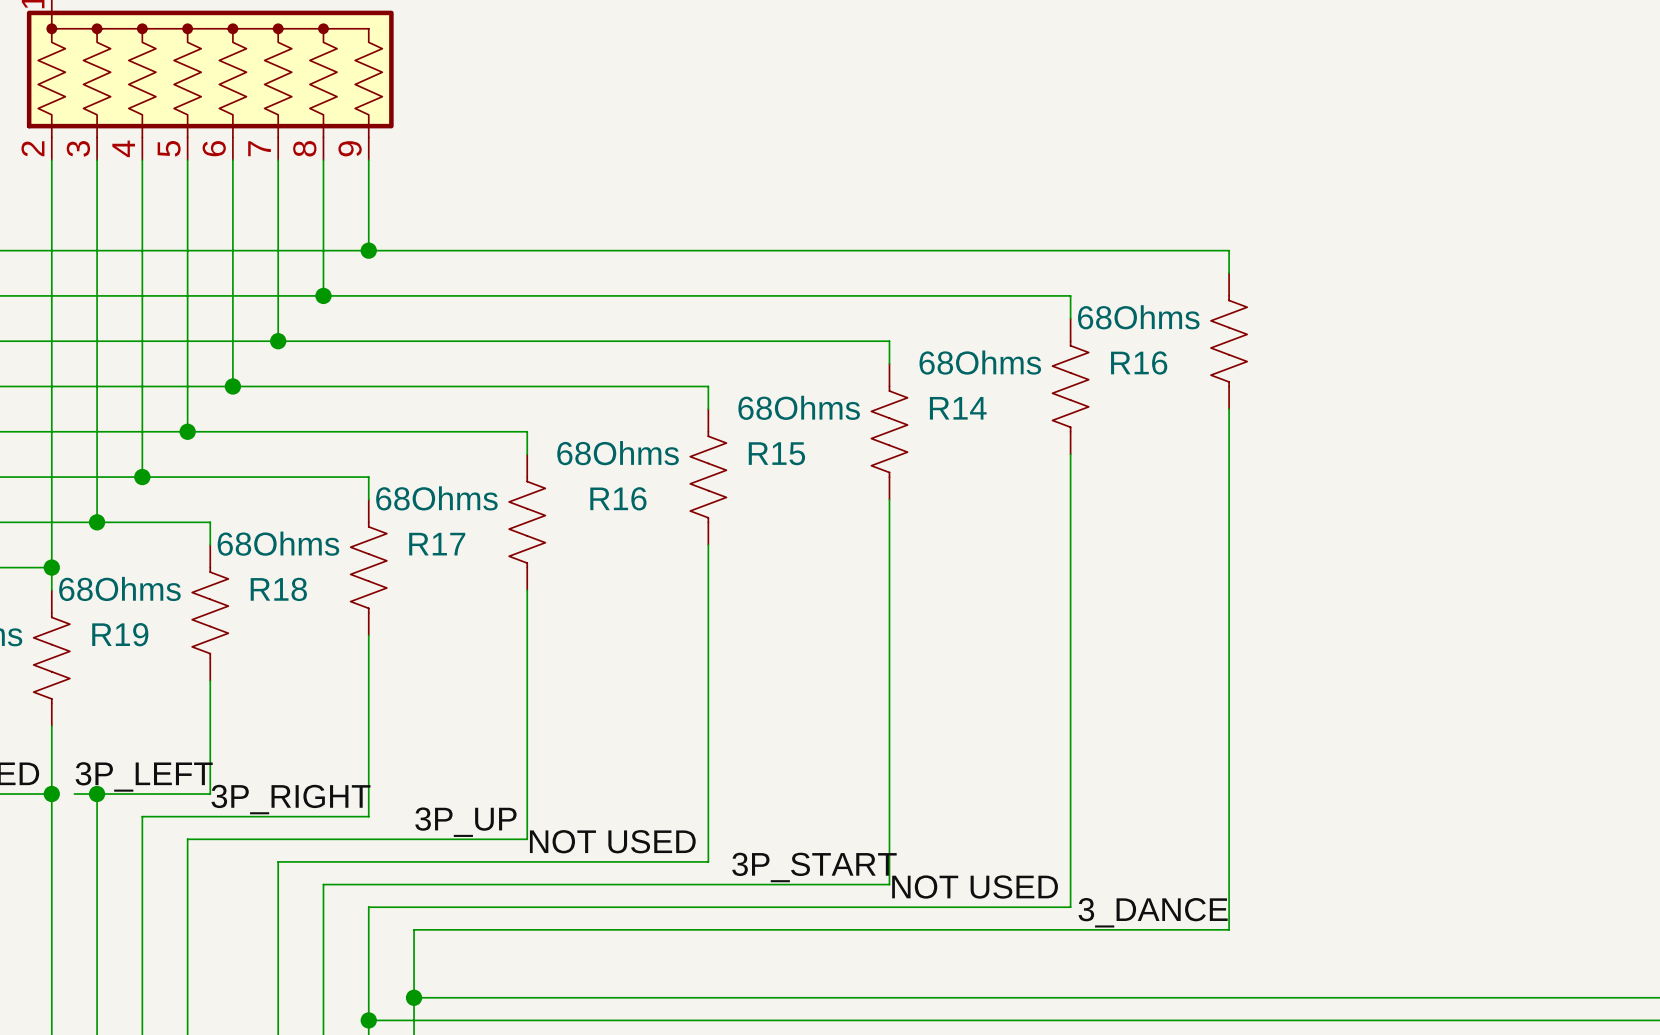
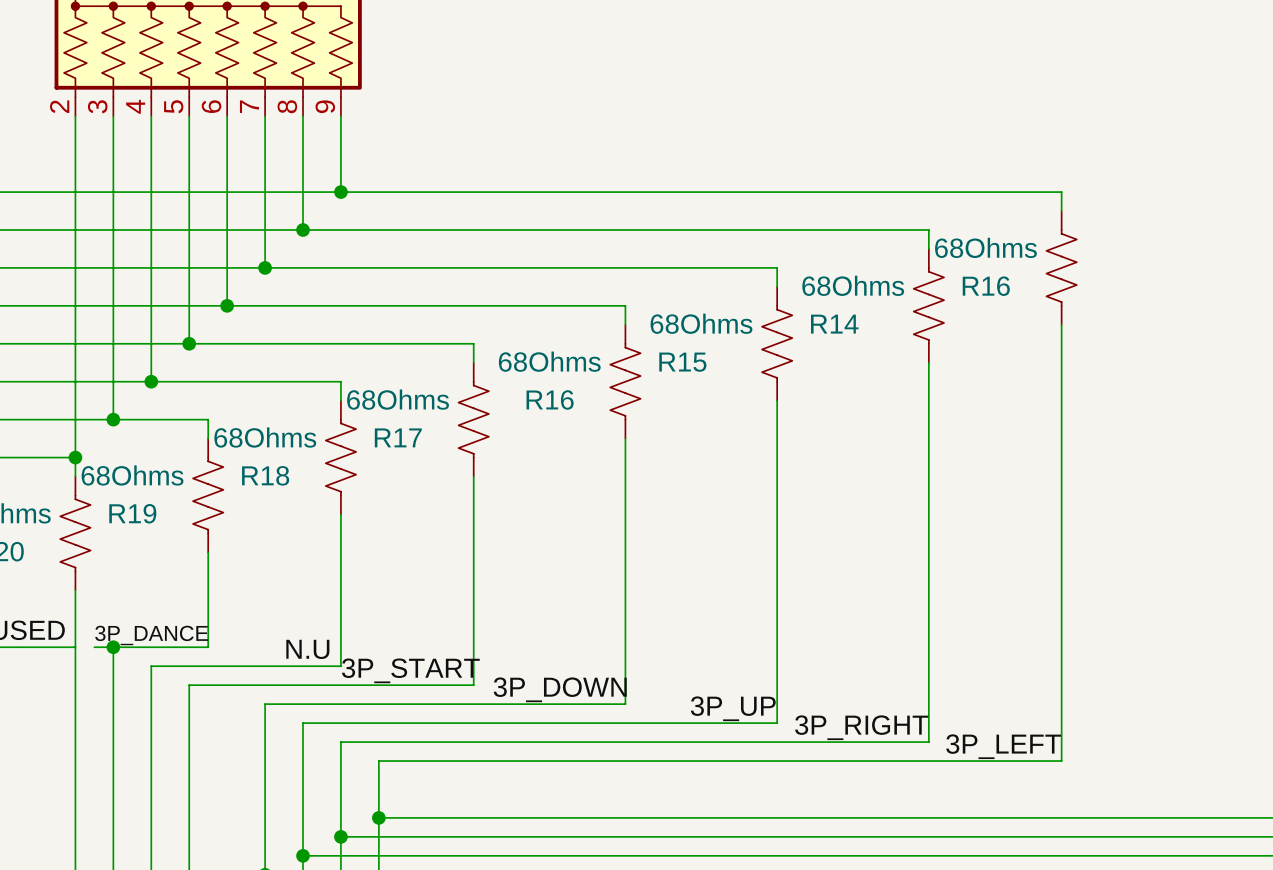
label: 3P_LEFT (144, 776) -> 3P_DANCE (151, 635)
junction: (51, 794) -> none
label: none -> N.U (307, 649)
label: 3P_RIGHT (290, 799) -> none
label: 3P_UP (465, 822) -> none
label: NOT USED (612, 841) -> none
label: none -> 3P_DOWN (560, 689)
label position: 3P_START (814, 867) -> 3P_START (410, 670)
label: none -> 3P_UP (733, 708)
label: NOT USED (975, 887) -> none
label: none -> 3P_RIGHT (861, 727)
label: 3_DANCE (1153, 912) -> 3P_LEFT (1003, 746)

